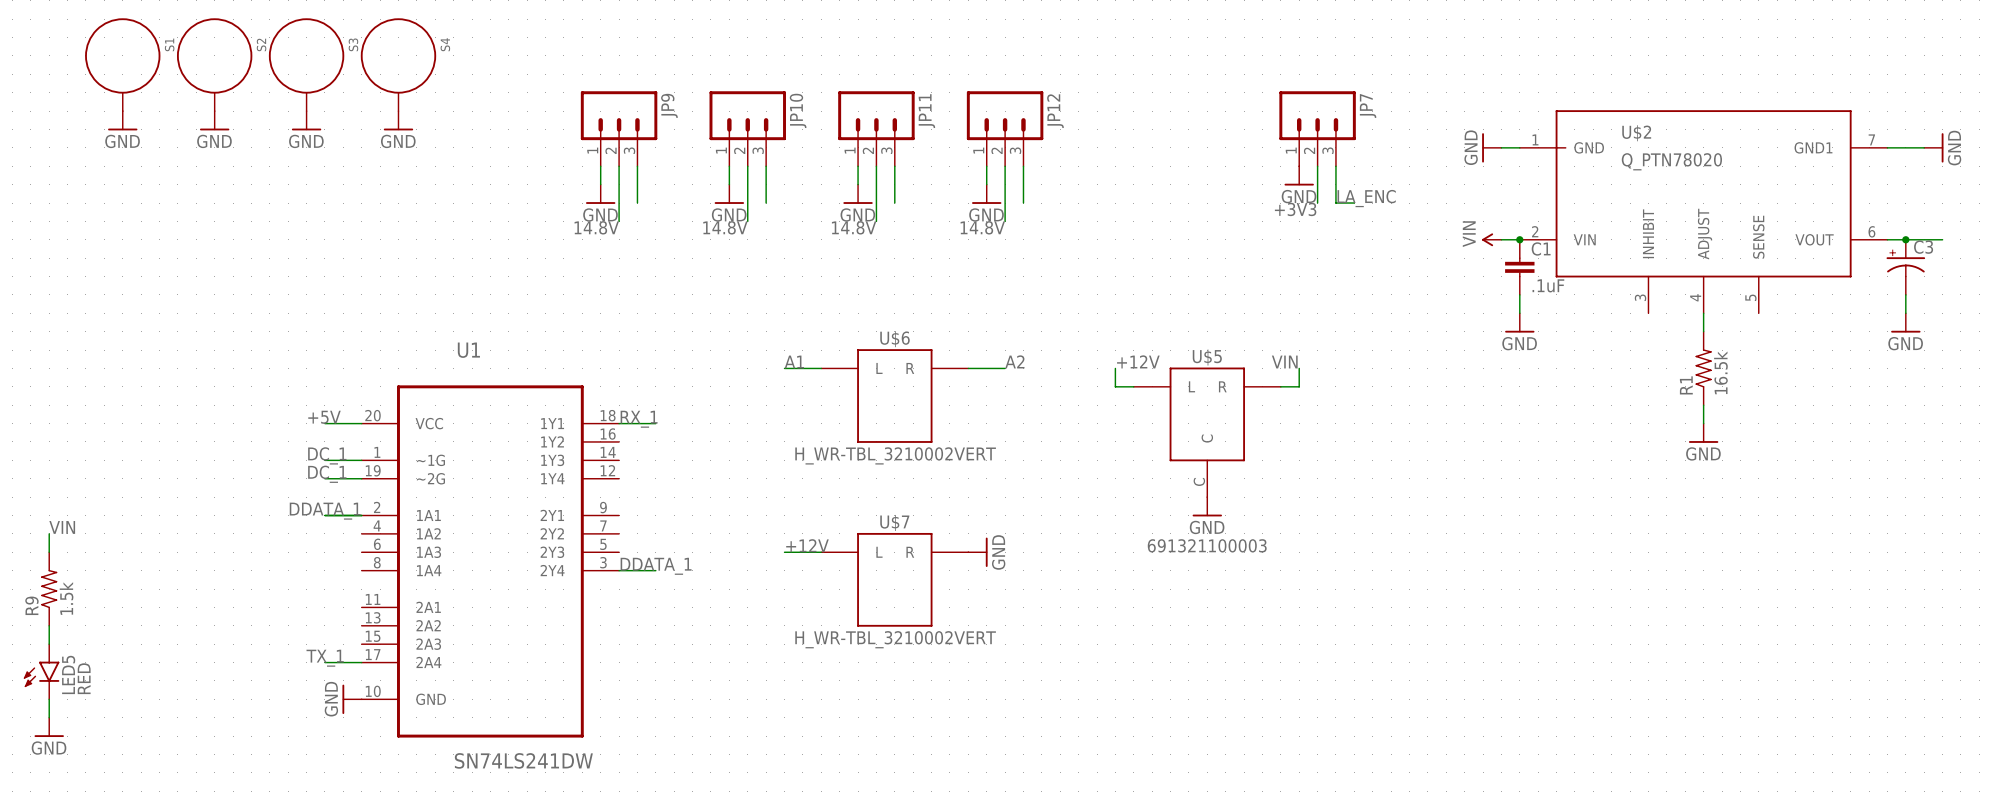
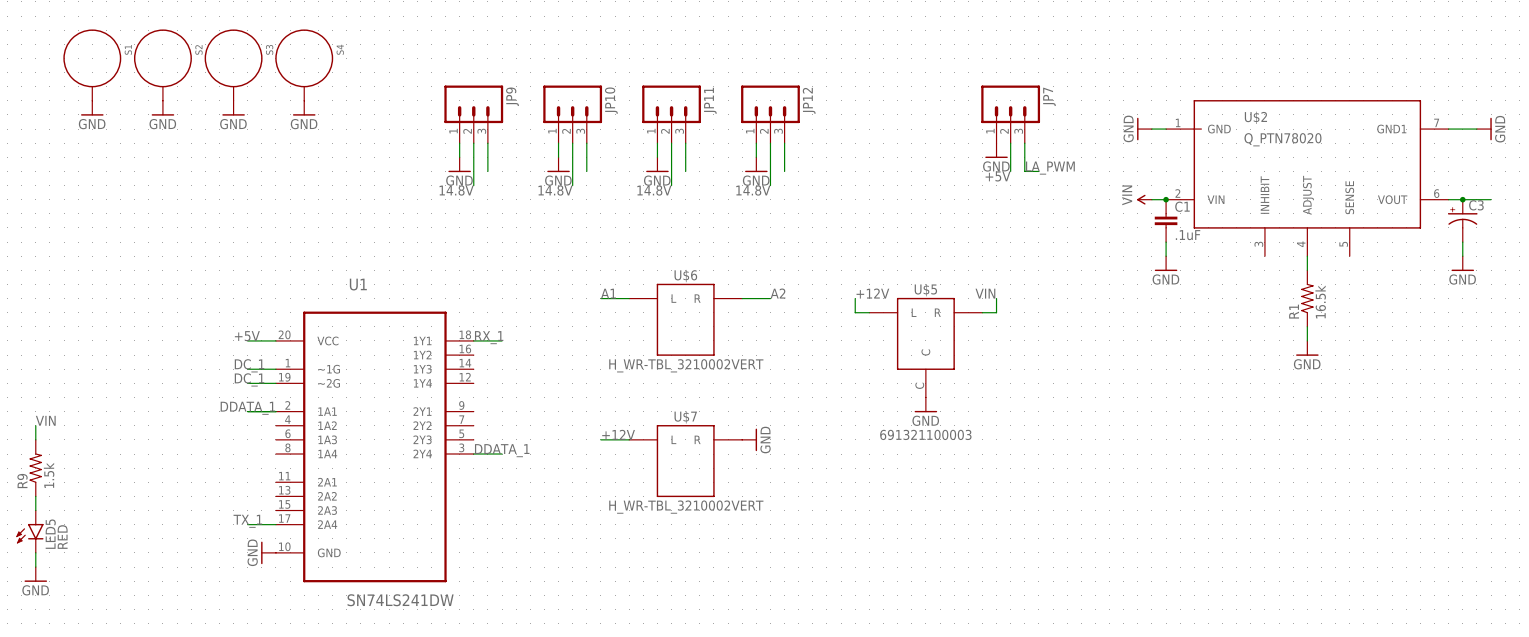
label: LA_ENC (1366, 198) -> LA_PWM (1050, 168)
label: +3V3 (1295, 209) -> +5V (998, 176)

